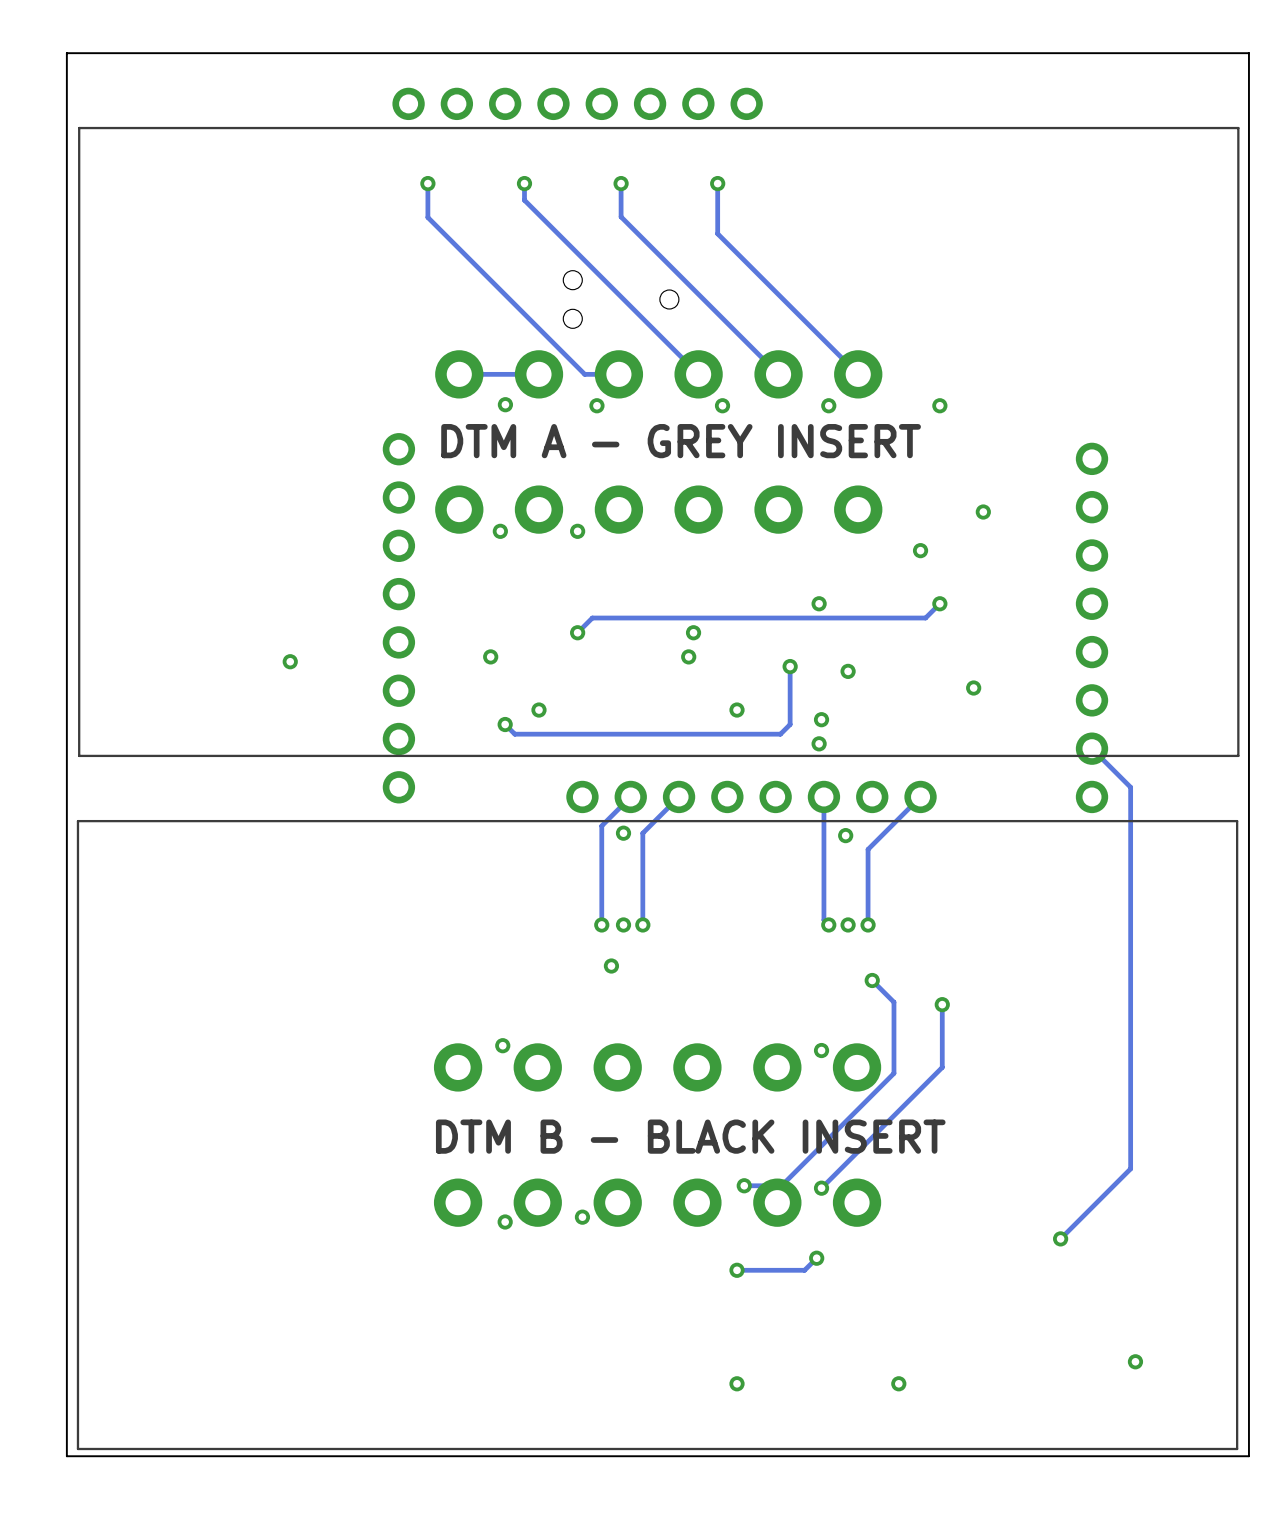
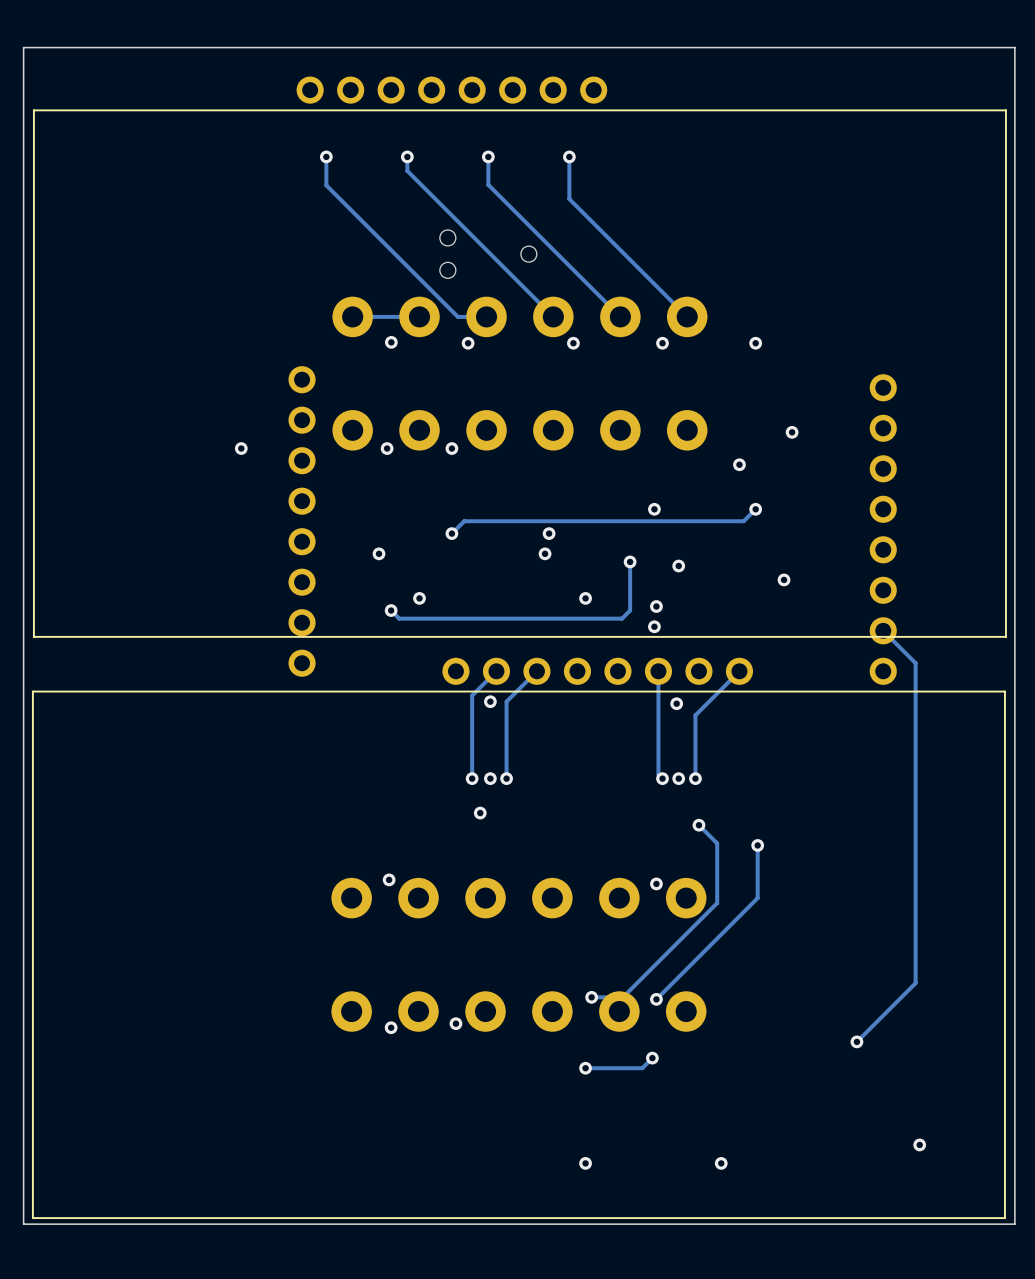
text: DTM A - GREY INSERT (681, 441) -> none
via: none -> (241, 448)
via: (290, 661) -> none
text: DTM B - BLACK INSERT (690, 1136) -> none

